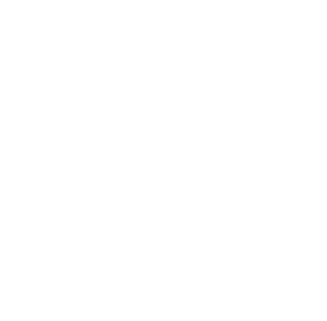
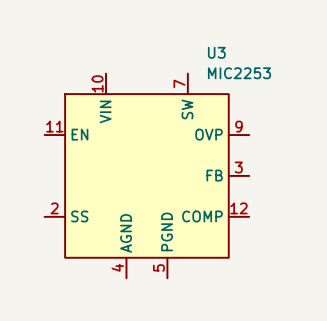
U3: none -> MIC2253 (146, 175)

